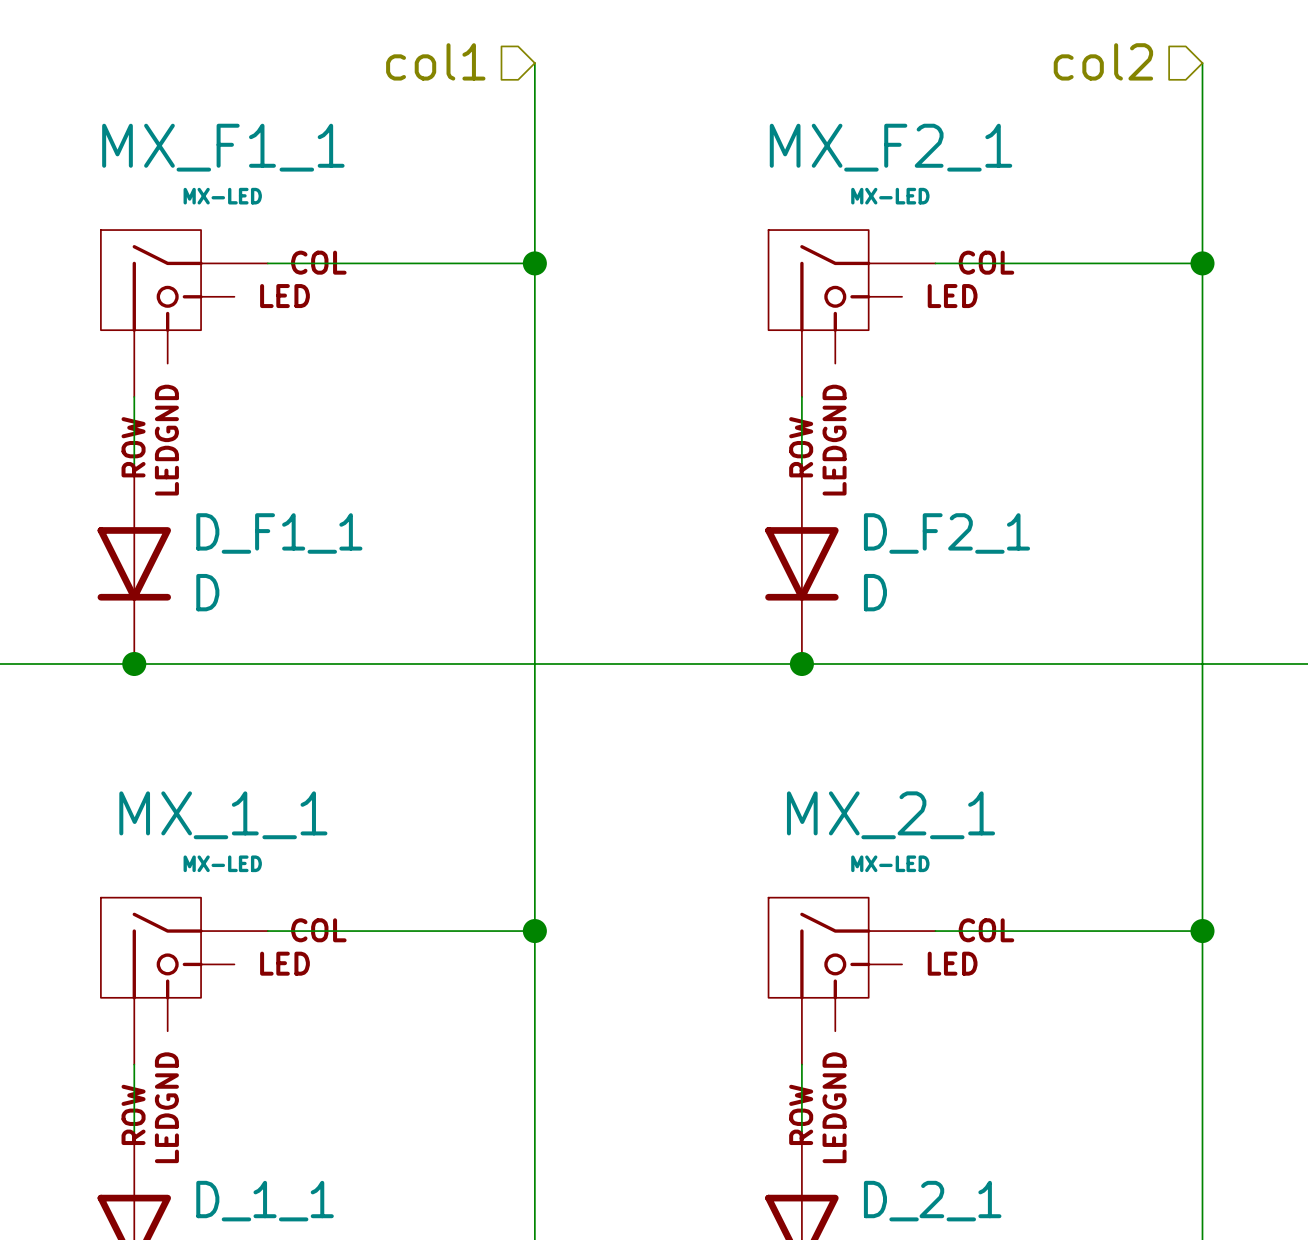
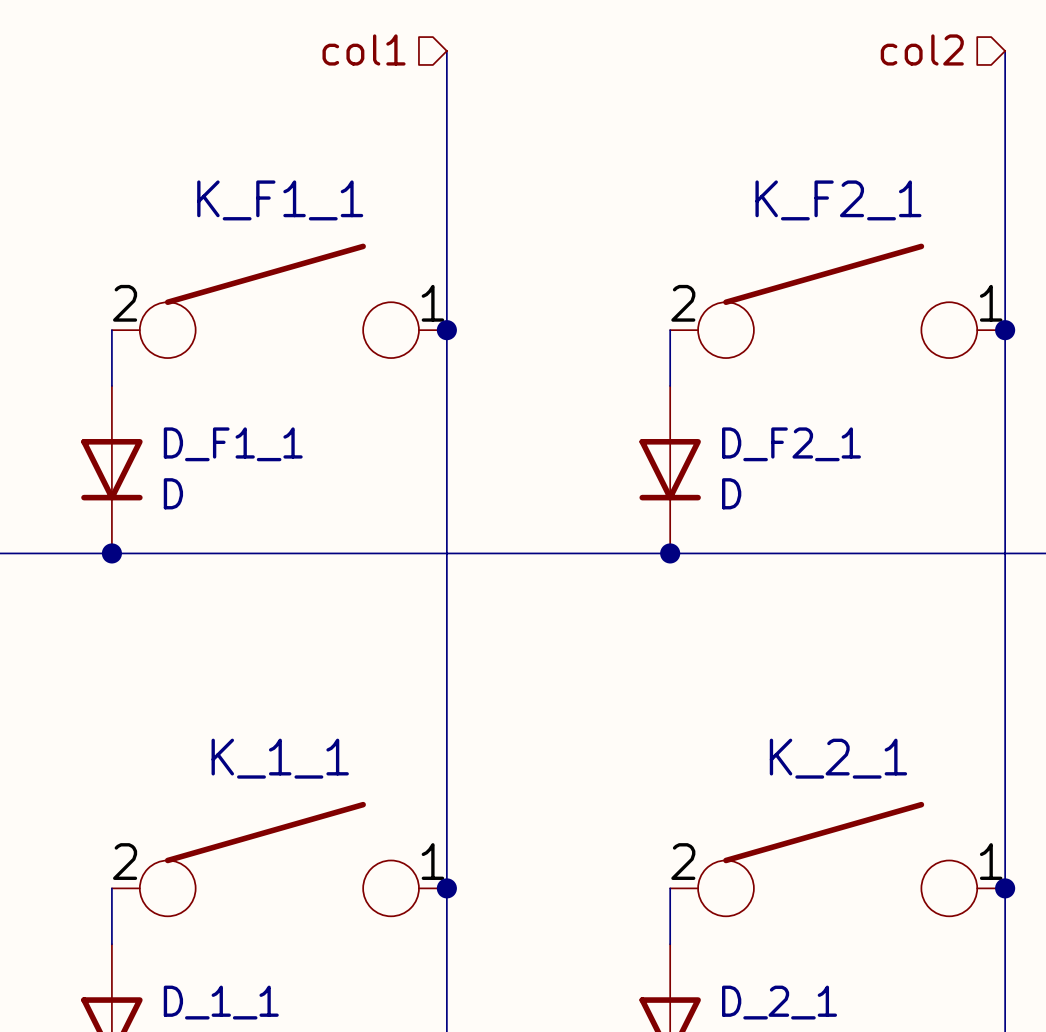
wire: (267, 263) (534, 263) -> none
junction position: (534, 263) -> (446, 330)
wire: (935, 263) (1202, 263) -> none
junction position: (1202, 263) -> (1005, 330)
MX_F1_1: MX-LED (184, 313) -> none
MX_F2_1: MX-LED (851, 313) -> none
K_F1_1: none -> (279, 300)
K_F2_1: none -> (837, 300)
wire: (267, 931) (534, 931) -> none
junction position: (534, 931) -> (446, 888)
wire: (935, 931) (1202, 931) -> none
junction position: (1202, 931) -> (1005, 888)
MX_1_1: MX-LED (184, 981) -> none
MX_2_1: MX-LED (851, 981) -> none
K_1_1: none -> (279, 859)
K_2_1: none -> (837, 859)

